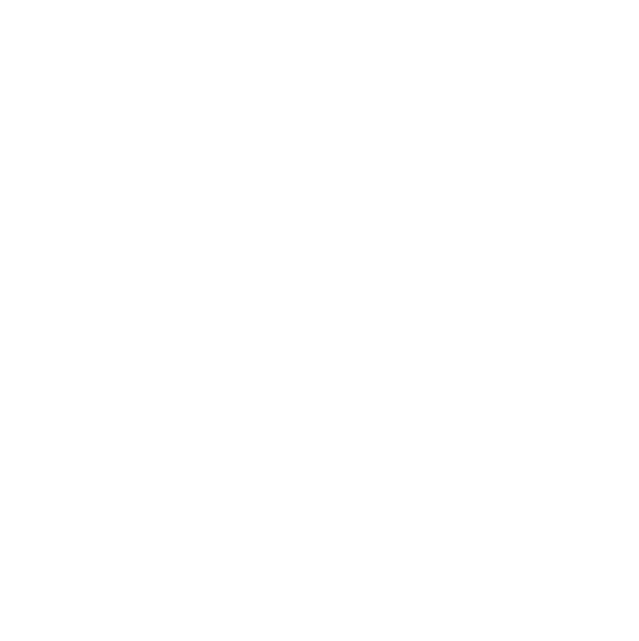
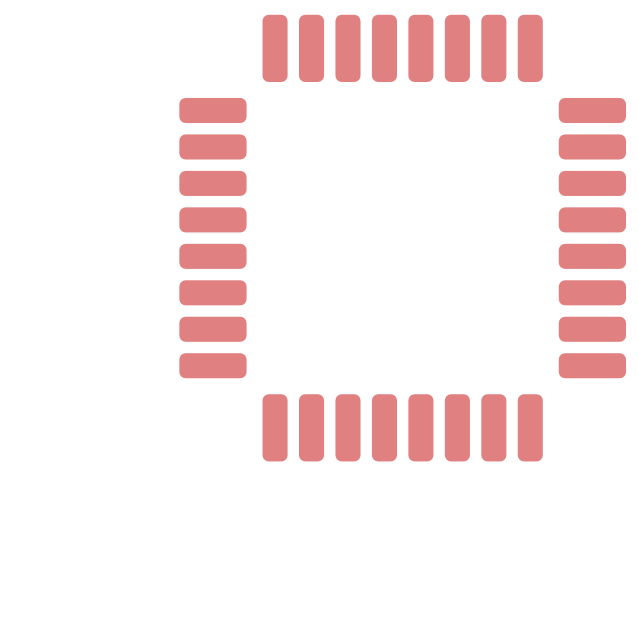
part: none -> (402, 238)

